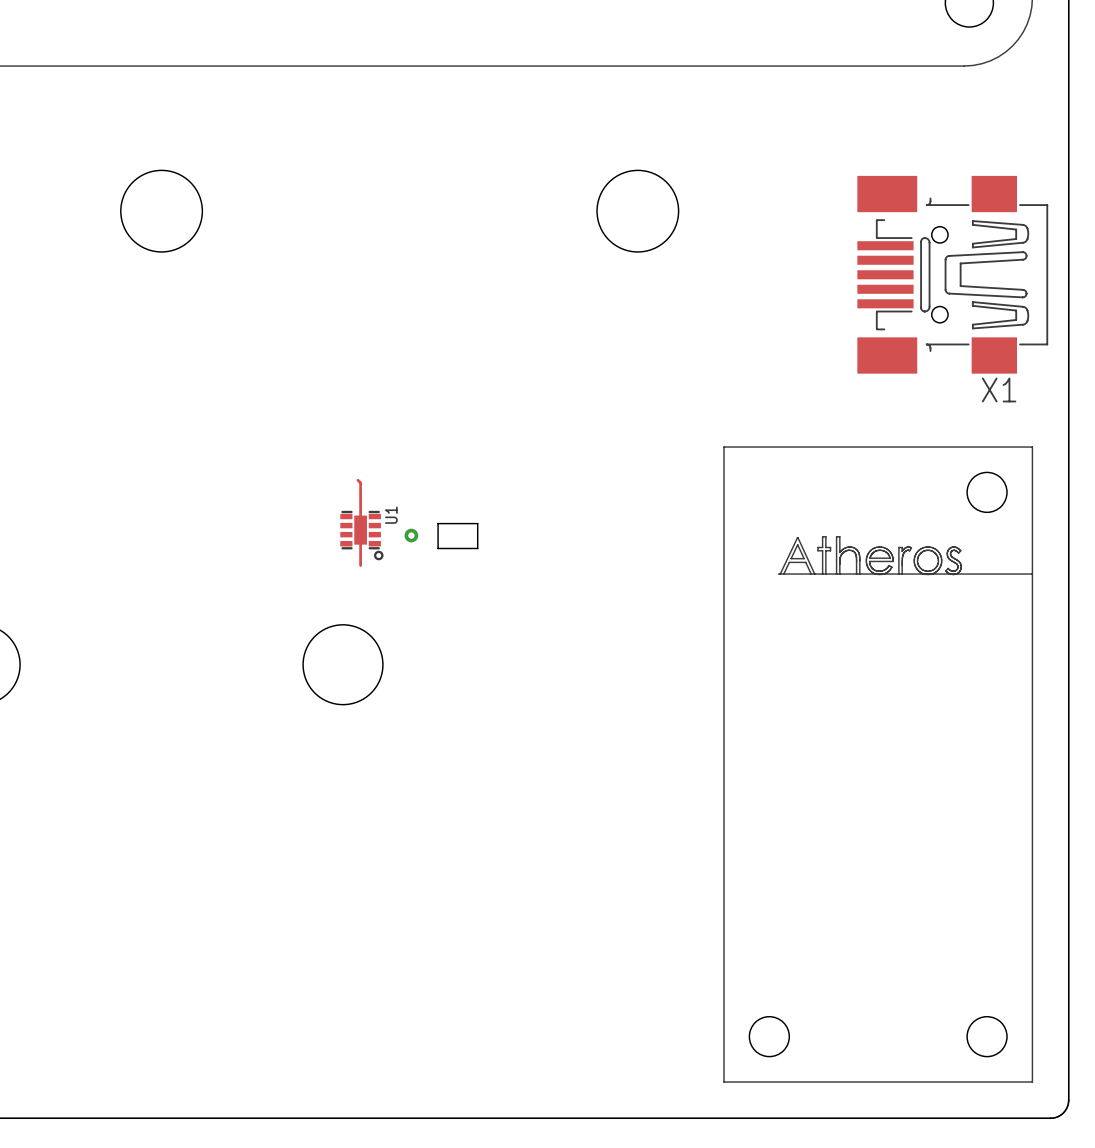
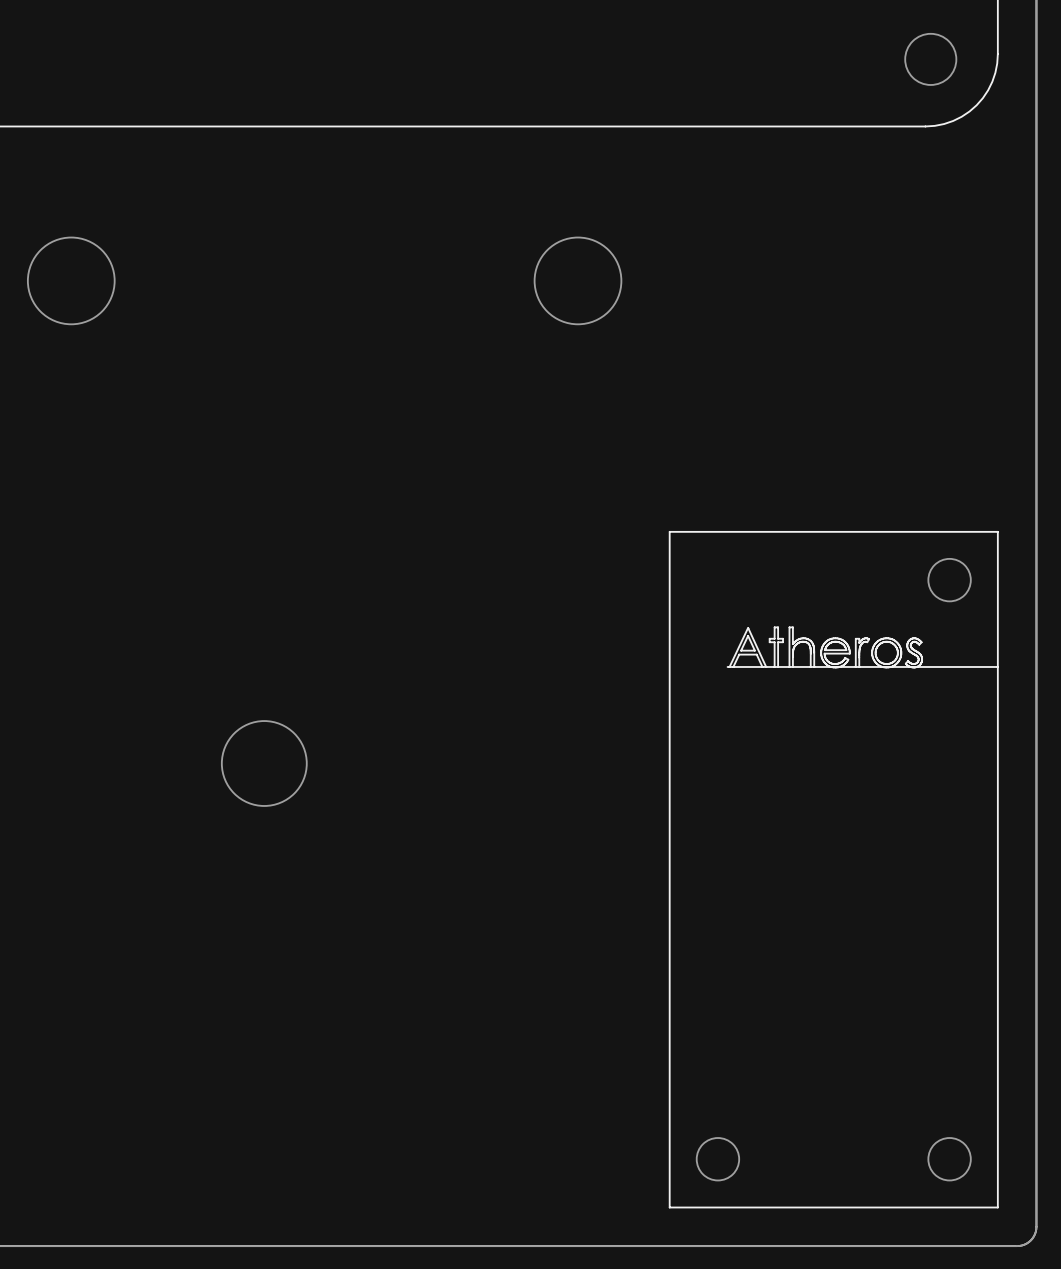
X1: (952, 274) -> none
track: (357, 480) (360, 482) (360, 565) -> none
board edge: (438, 523) (438, 548) (477, 548) (477, 523) (438, 523) -> none
U1: (361, 535) -> none
via: (411, 535) -> none

